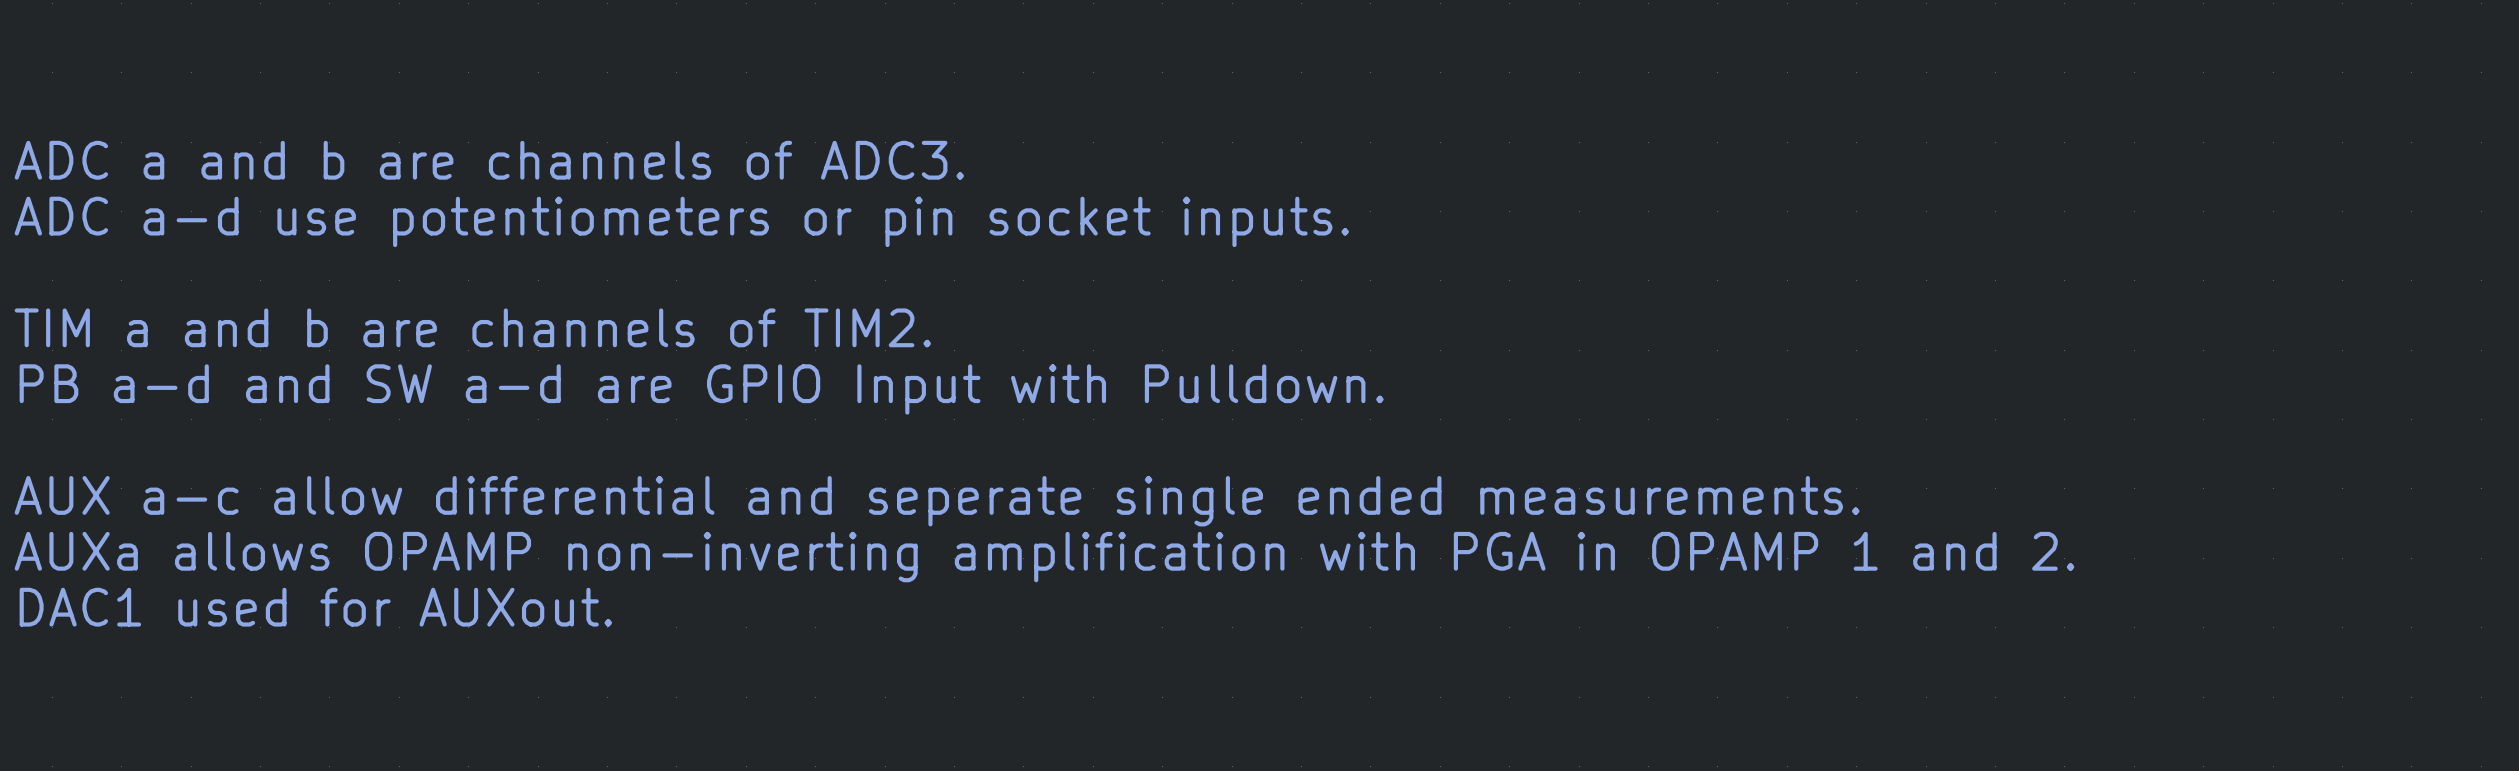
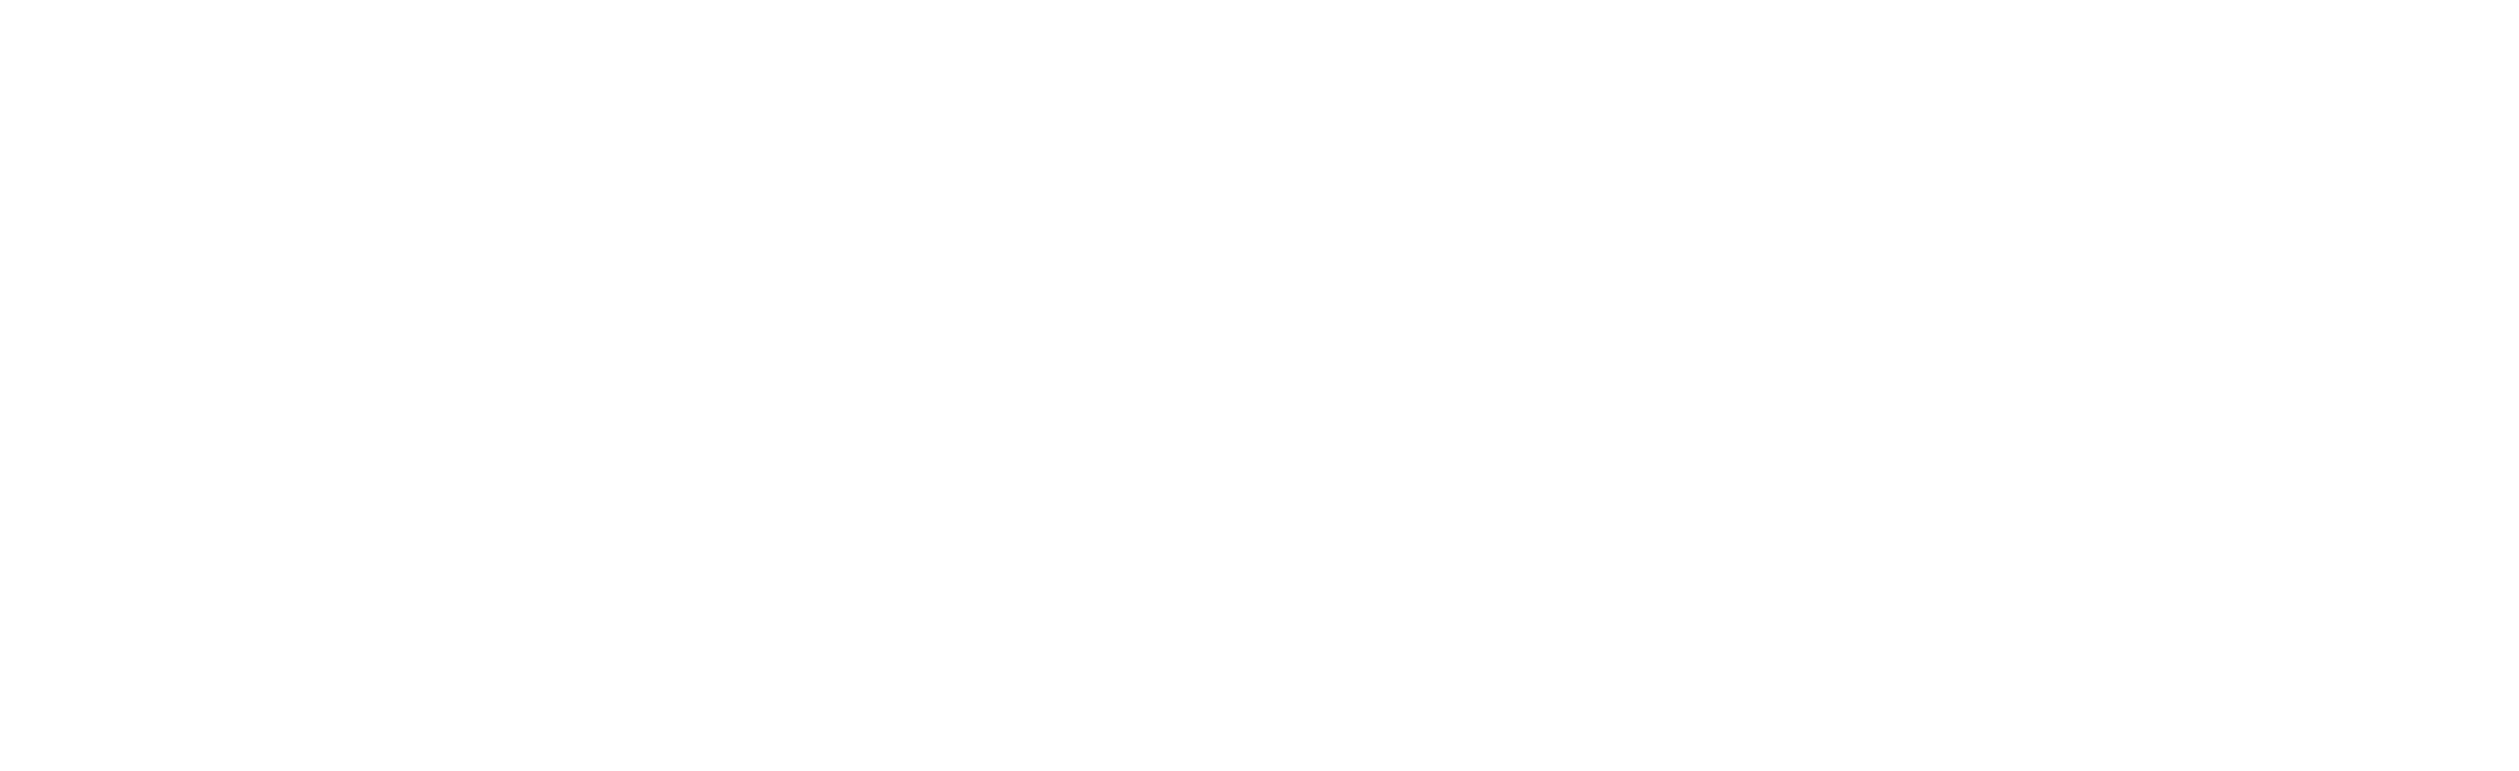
text: ADC a and b are channels of ADC3. (489, 160) -> none
text: ADC a-d use potentiometers or pin socket inputs. (681, 221) -> none
text: TIM a and b are channels of TIM2. (472, 327) -> none
text: PB a-d and SW a-d are GPIO Input with Pulldown. (701, 389) -> none
text: AUX a-c allow differential and seperate single ended measurements. (937, 501) -> none
text: AUXa allows OPAMP non-inverting amplification with PGA in OPAMP 1 and 2. (1044, 557) -> none
text: DAC1 used for AUXout. (315, 607) -> none

